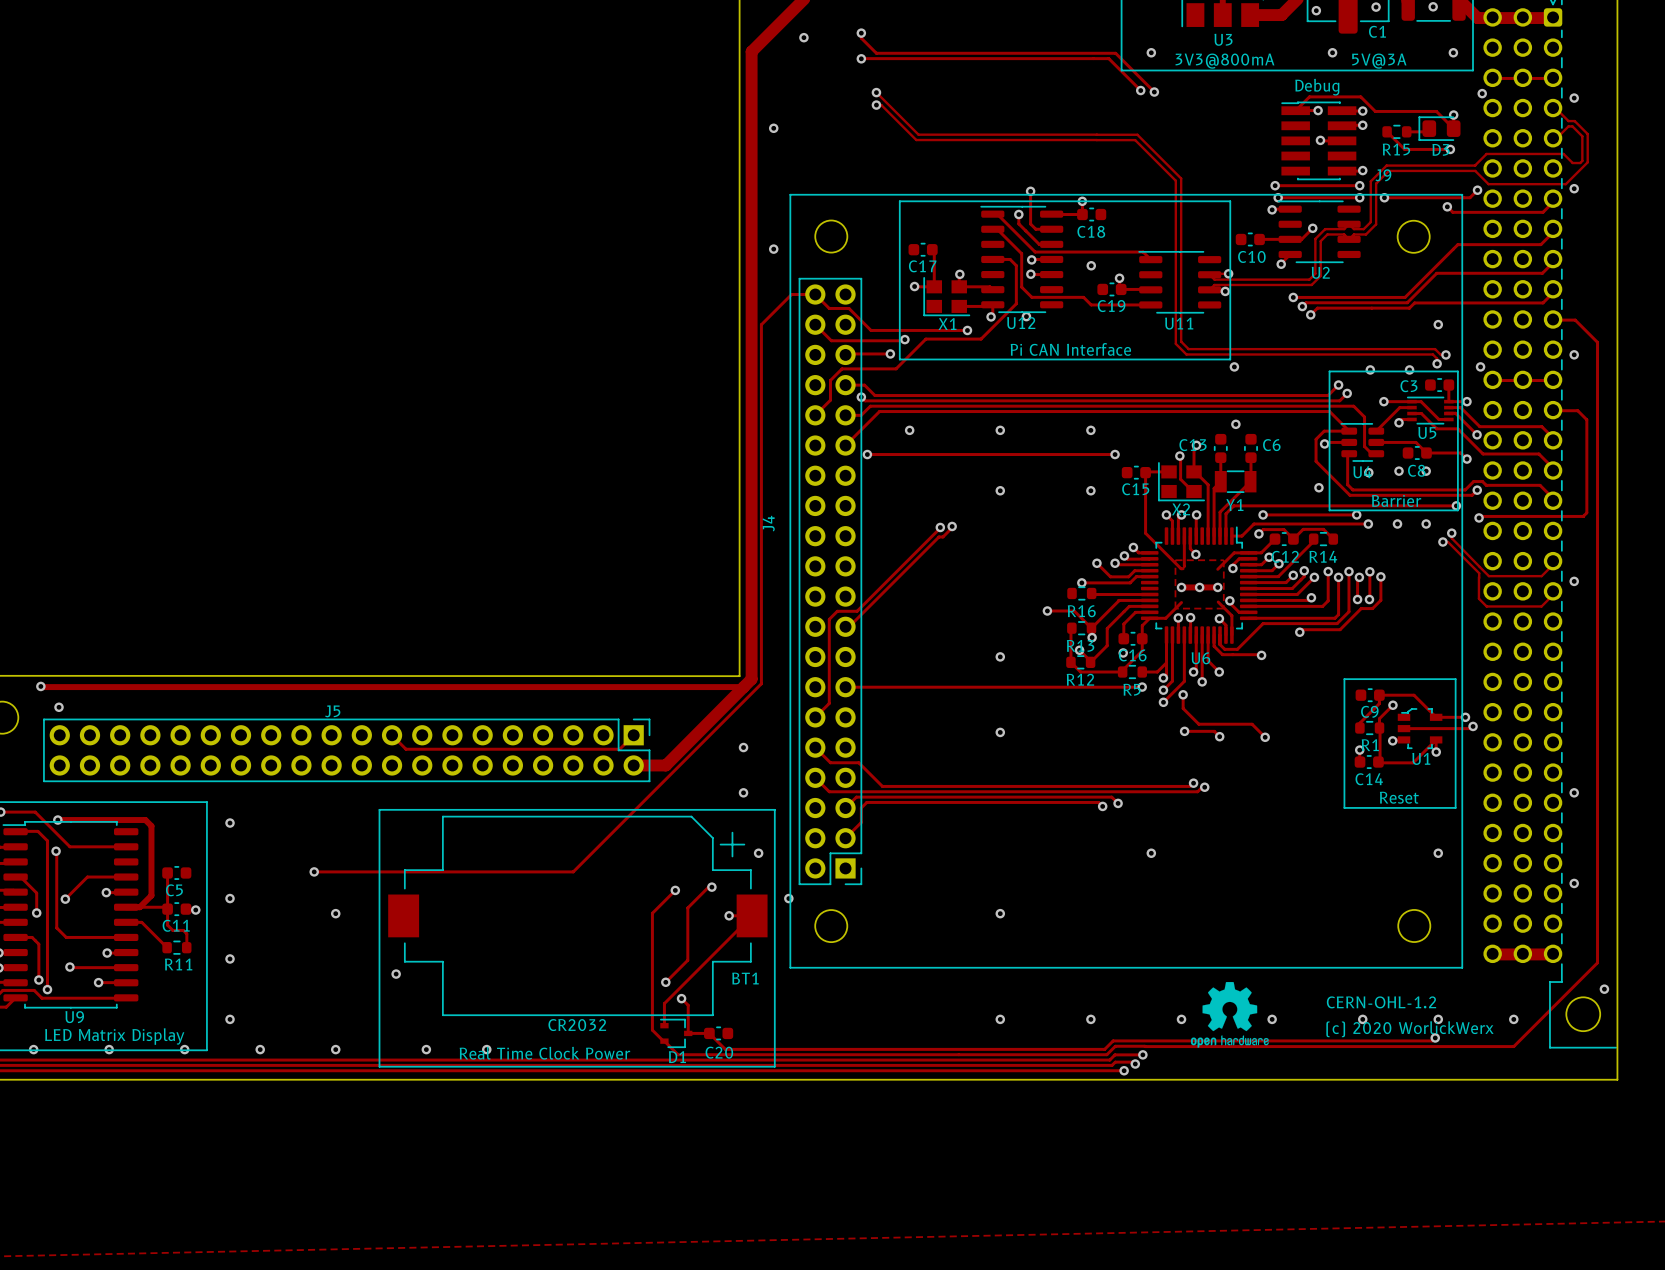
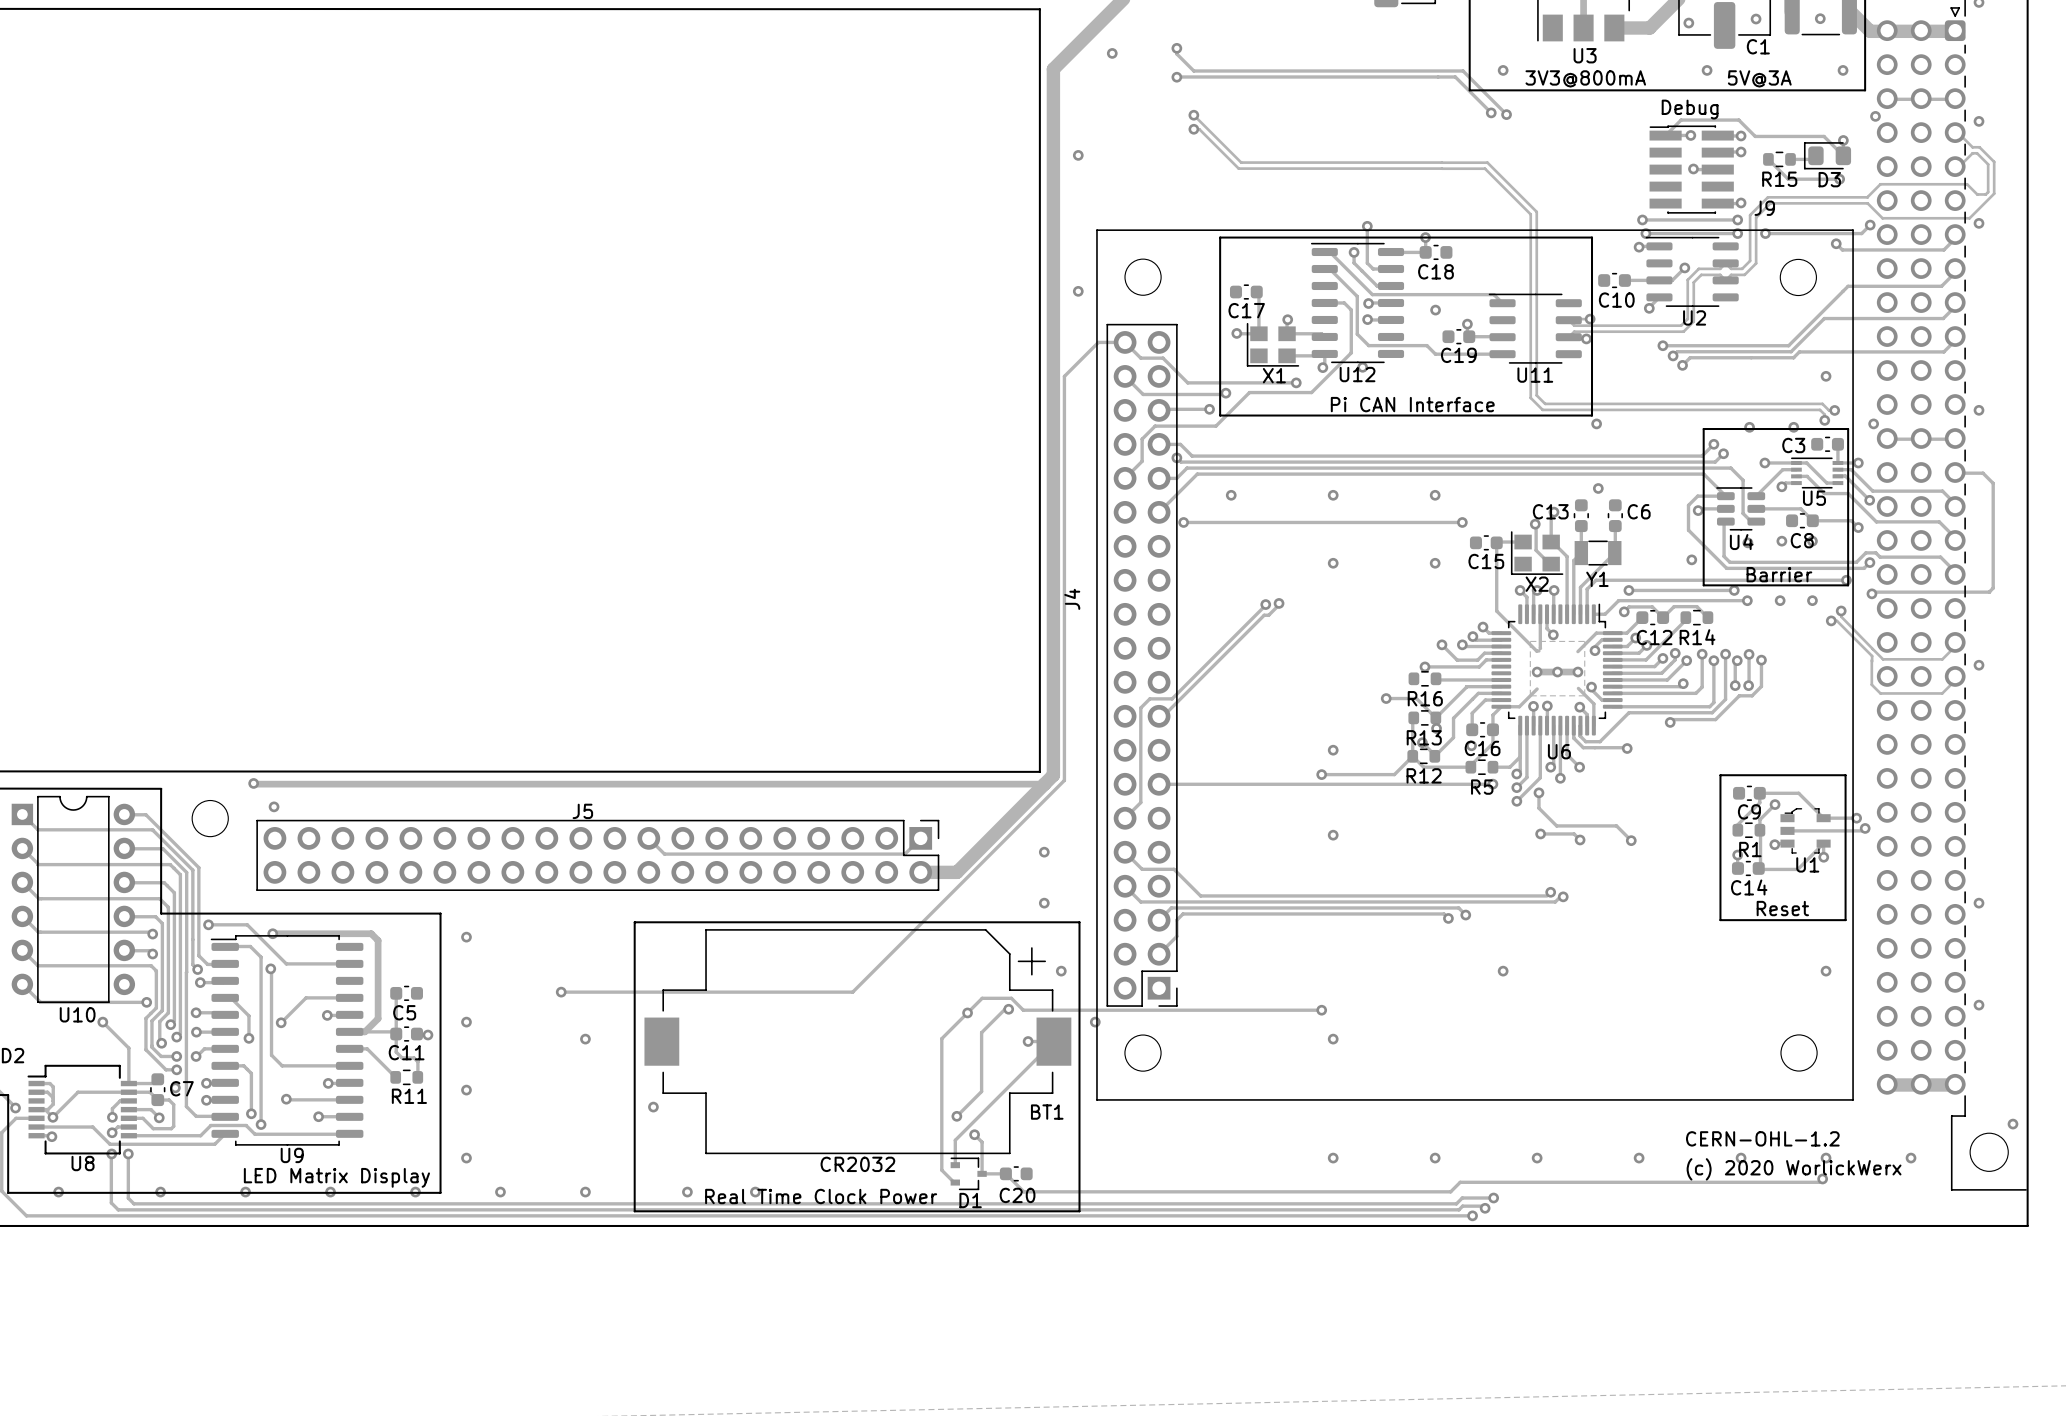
track: (1556, 320) (1575, 320) (1597, 342) (1597, 962) (1513, 1046) (1115, 1046) (1106, 1054) (678, 1054) (664, 1041) -> none
track: none -> (1412, 756) (1394, 774) (1321, 774)
via: none -> (1321, 774)
track: none -> (1321, 1010) (1023, 1010) (1011, 998) (982, 998) (967, 1012)
via: none -> (1321, 1010)
drawing: [1190, 981, 1269, 1048] -> none

